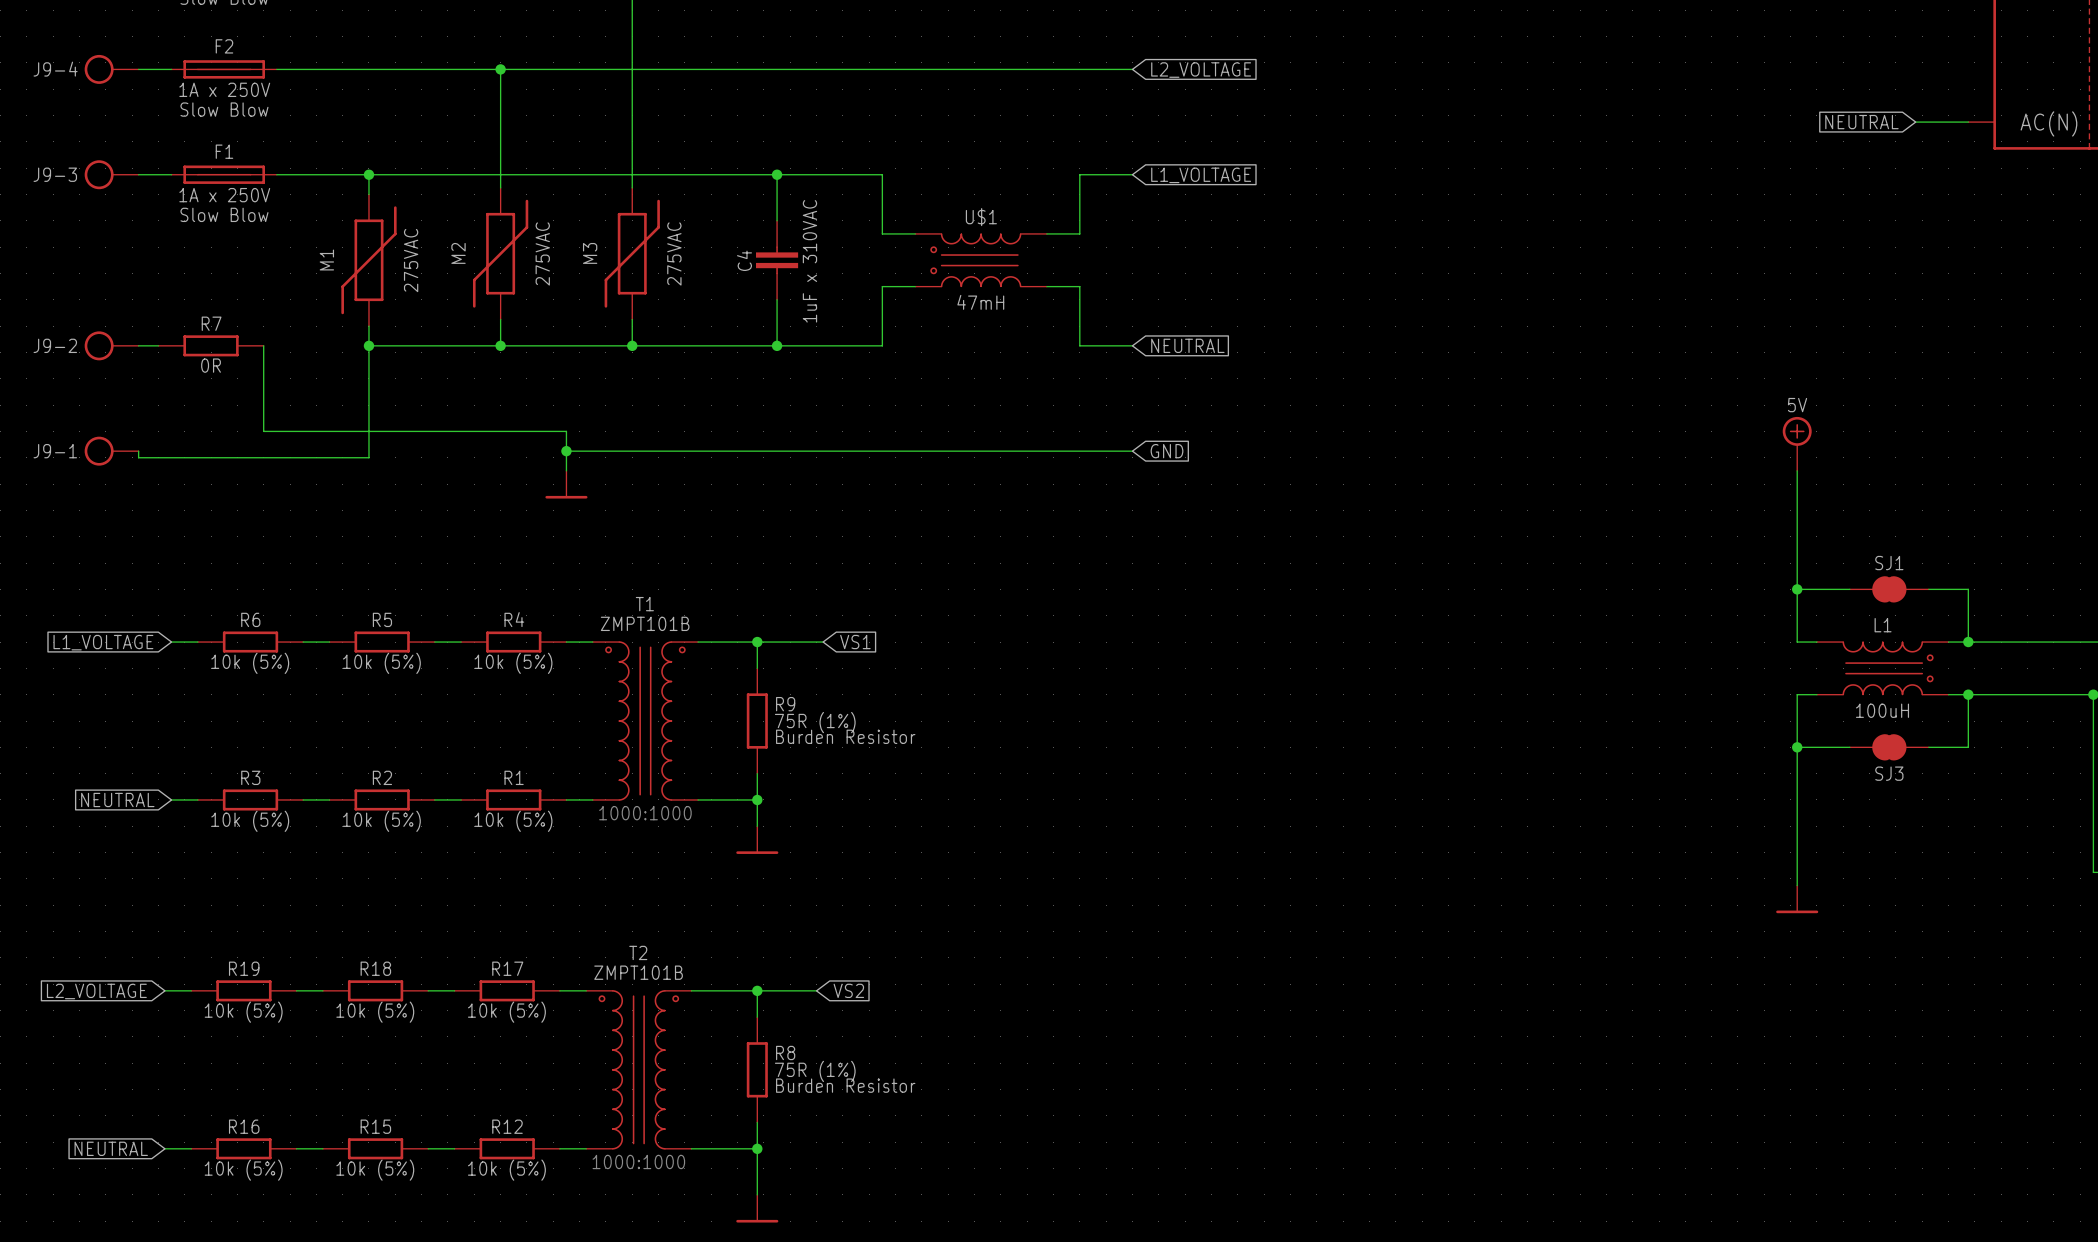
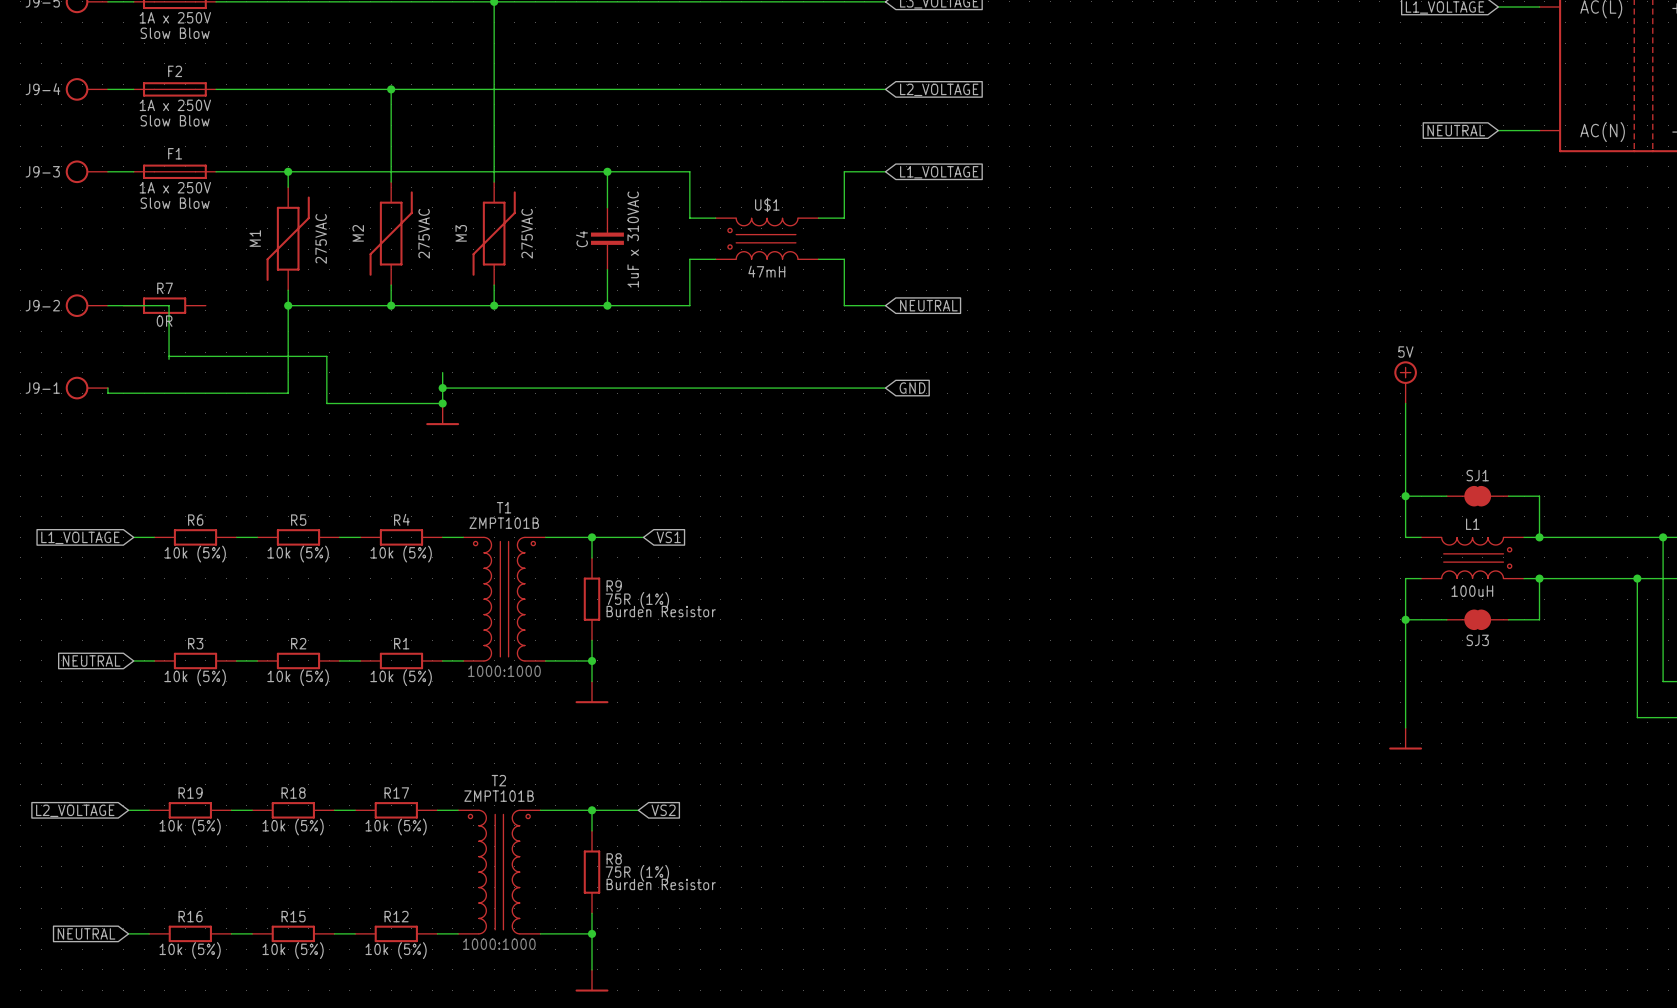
wire: none -> (123, 305) (169, 305) (169, 359)
wire: (263, 345) (263, 431) (566, 431) -> none
wire: none -> (169, 356) (326, 356) (326, 403) (442, 403)
junction: none -> (442, 403)

